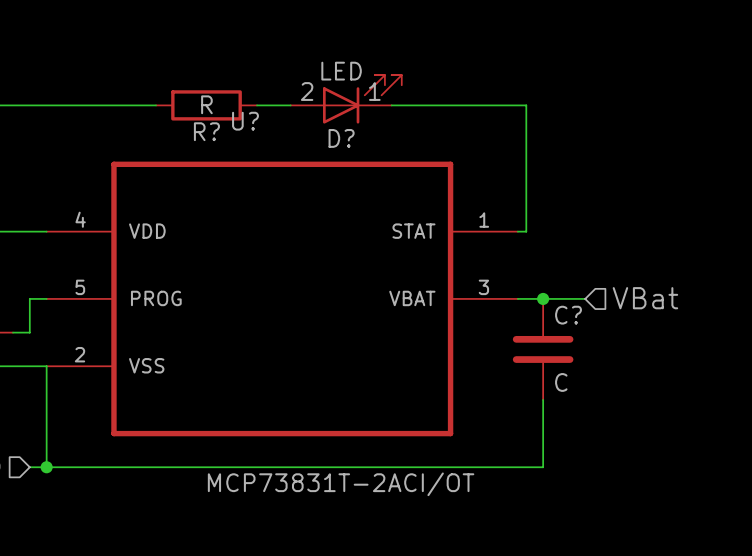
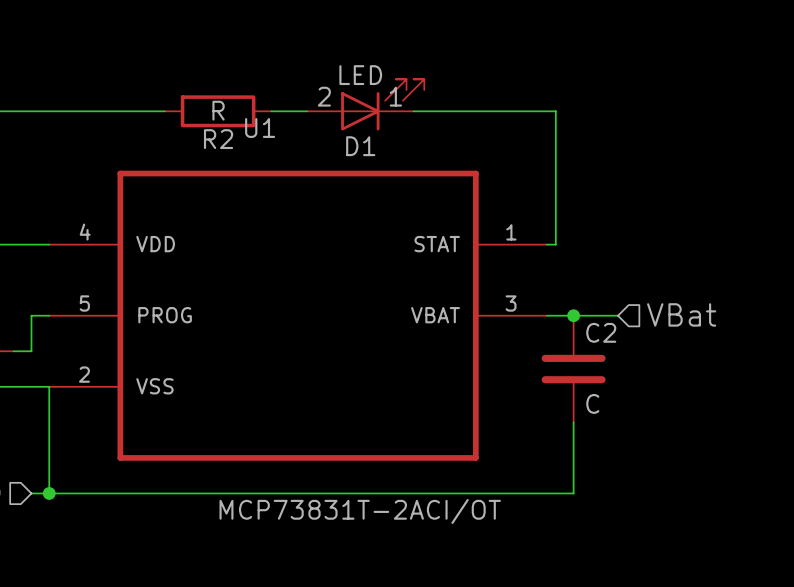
U? name: U? (245, 121) -> U1 (260, 127)
R? name: R? (206, 131) -> R2 (218, 139)
D? name: D? (341, 138) -> D1 (360, 146)
C? name: C? (568, 315) -> C2 (601, 332)

